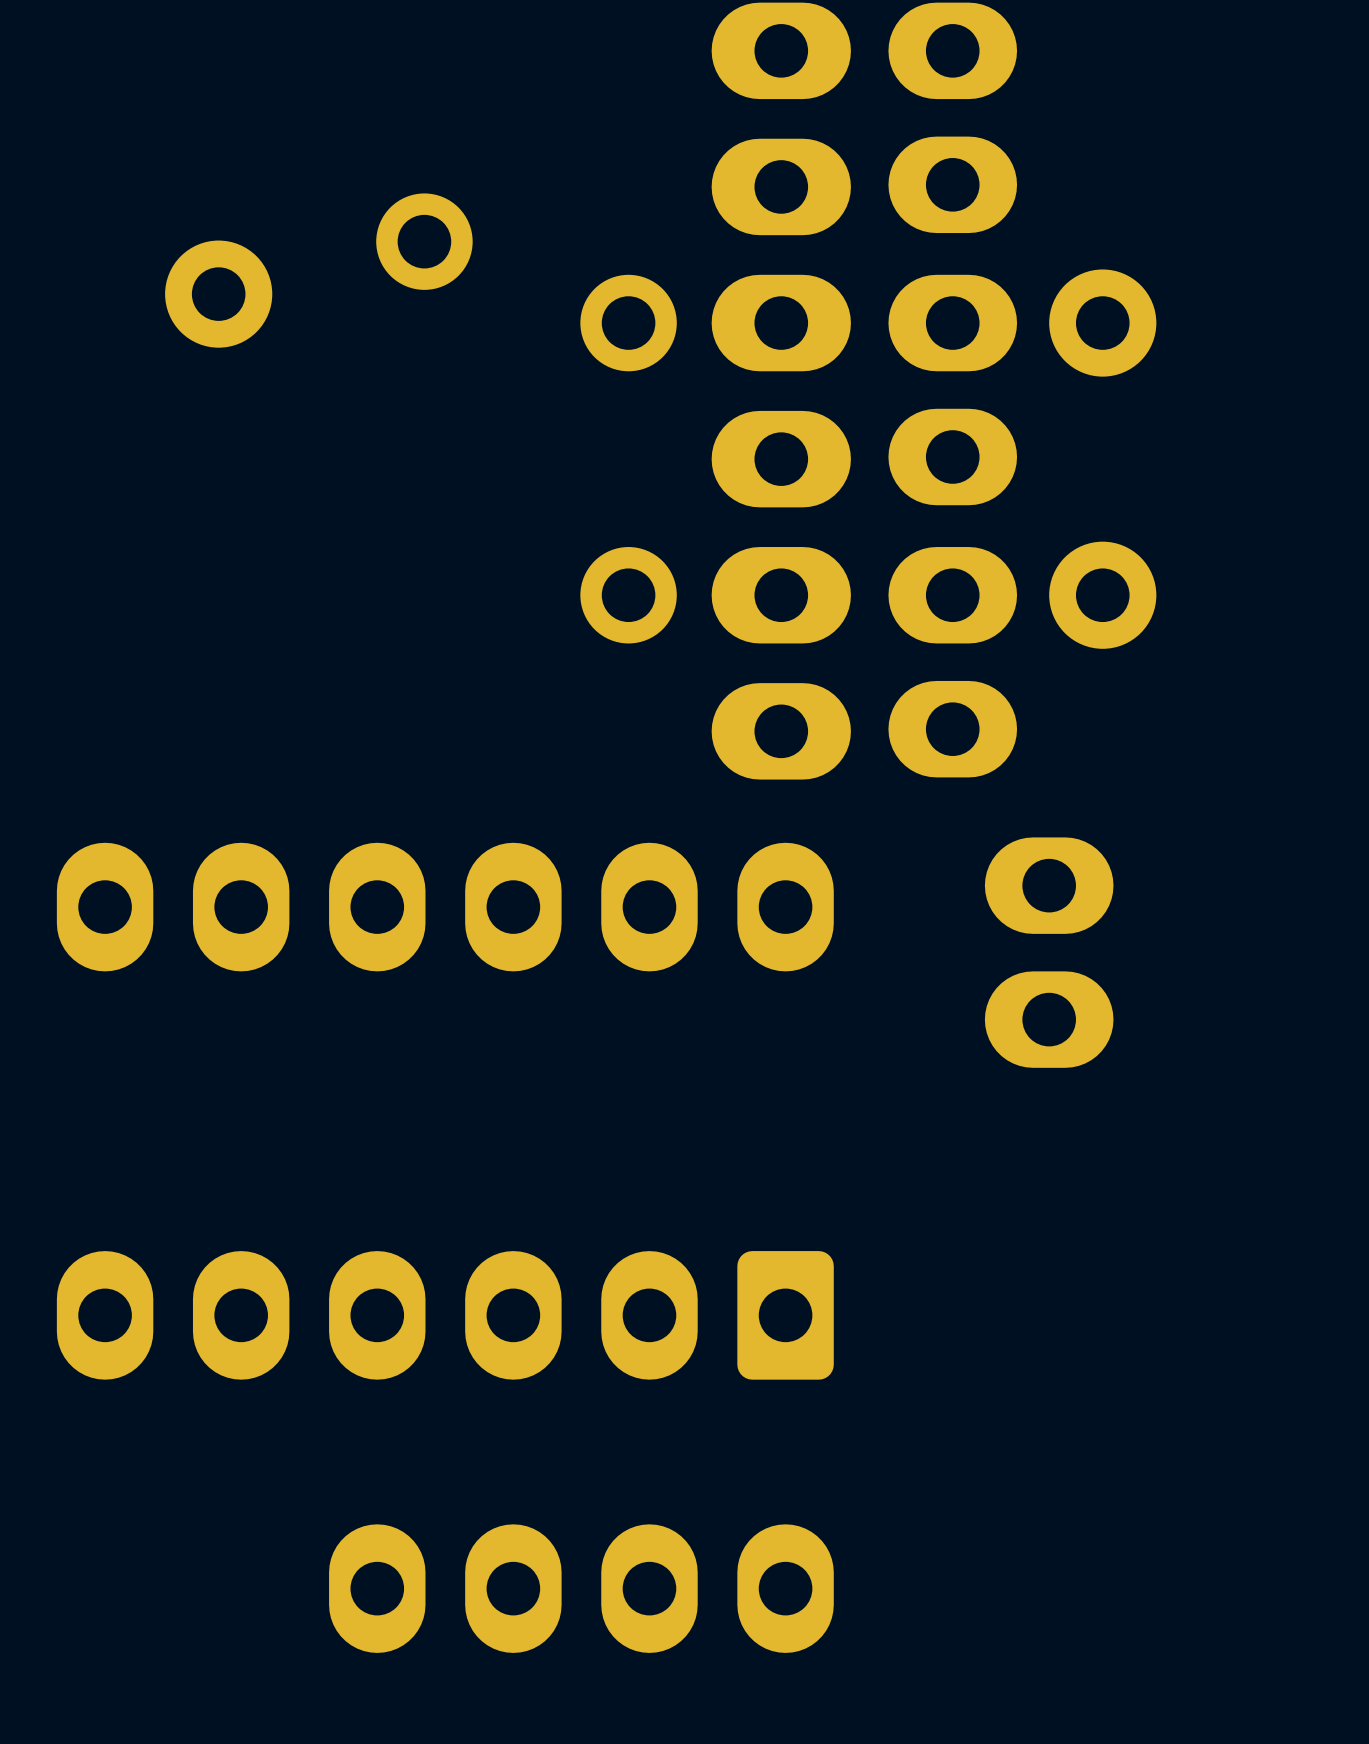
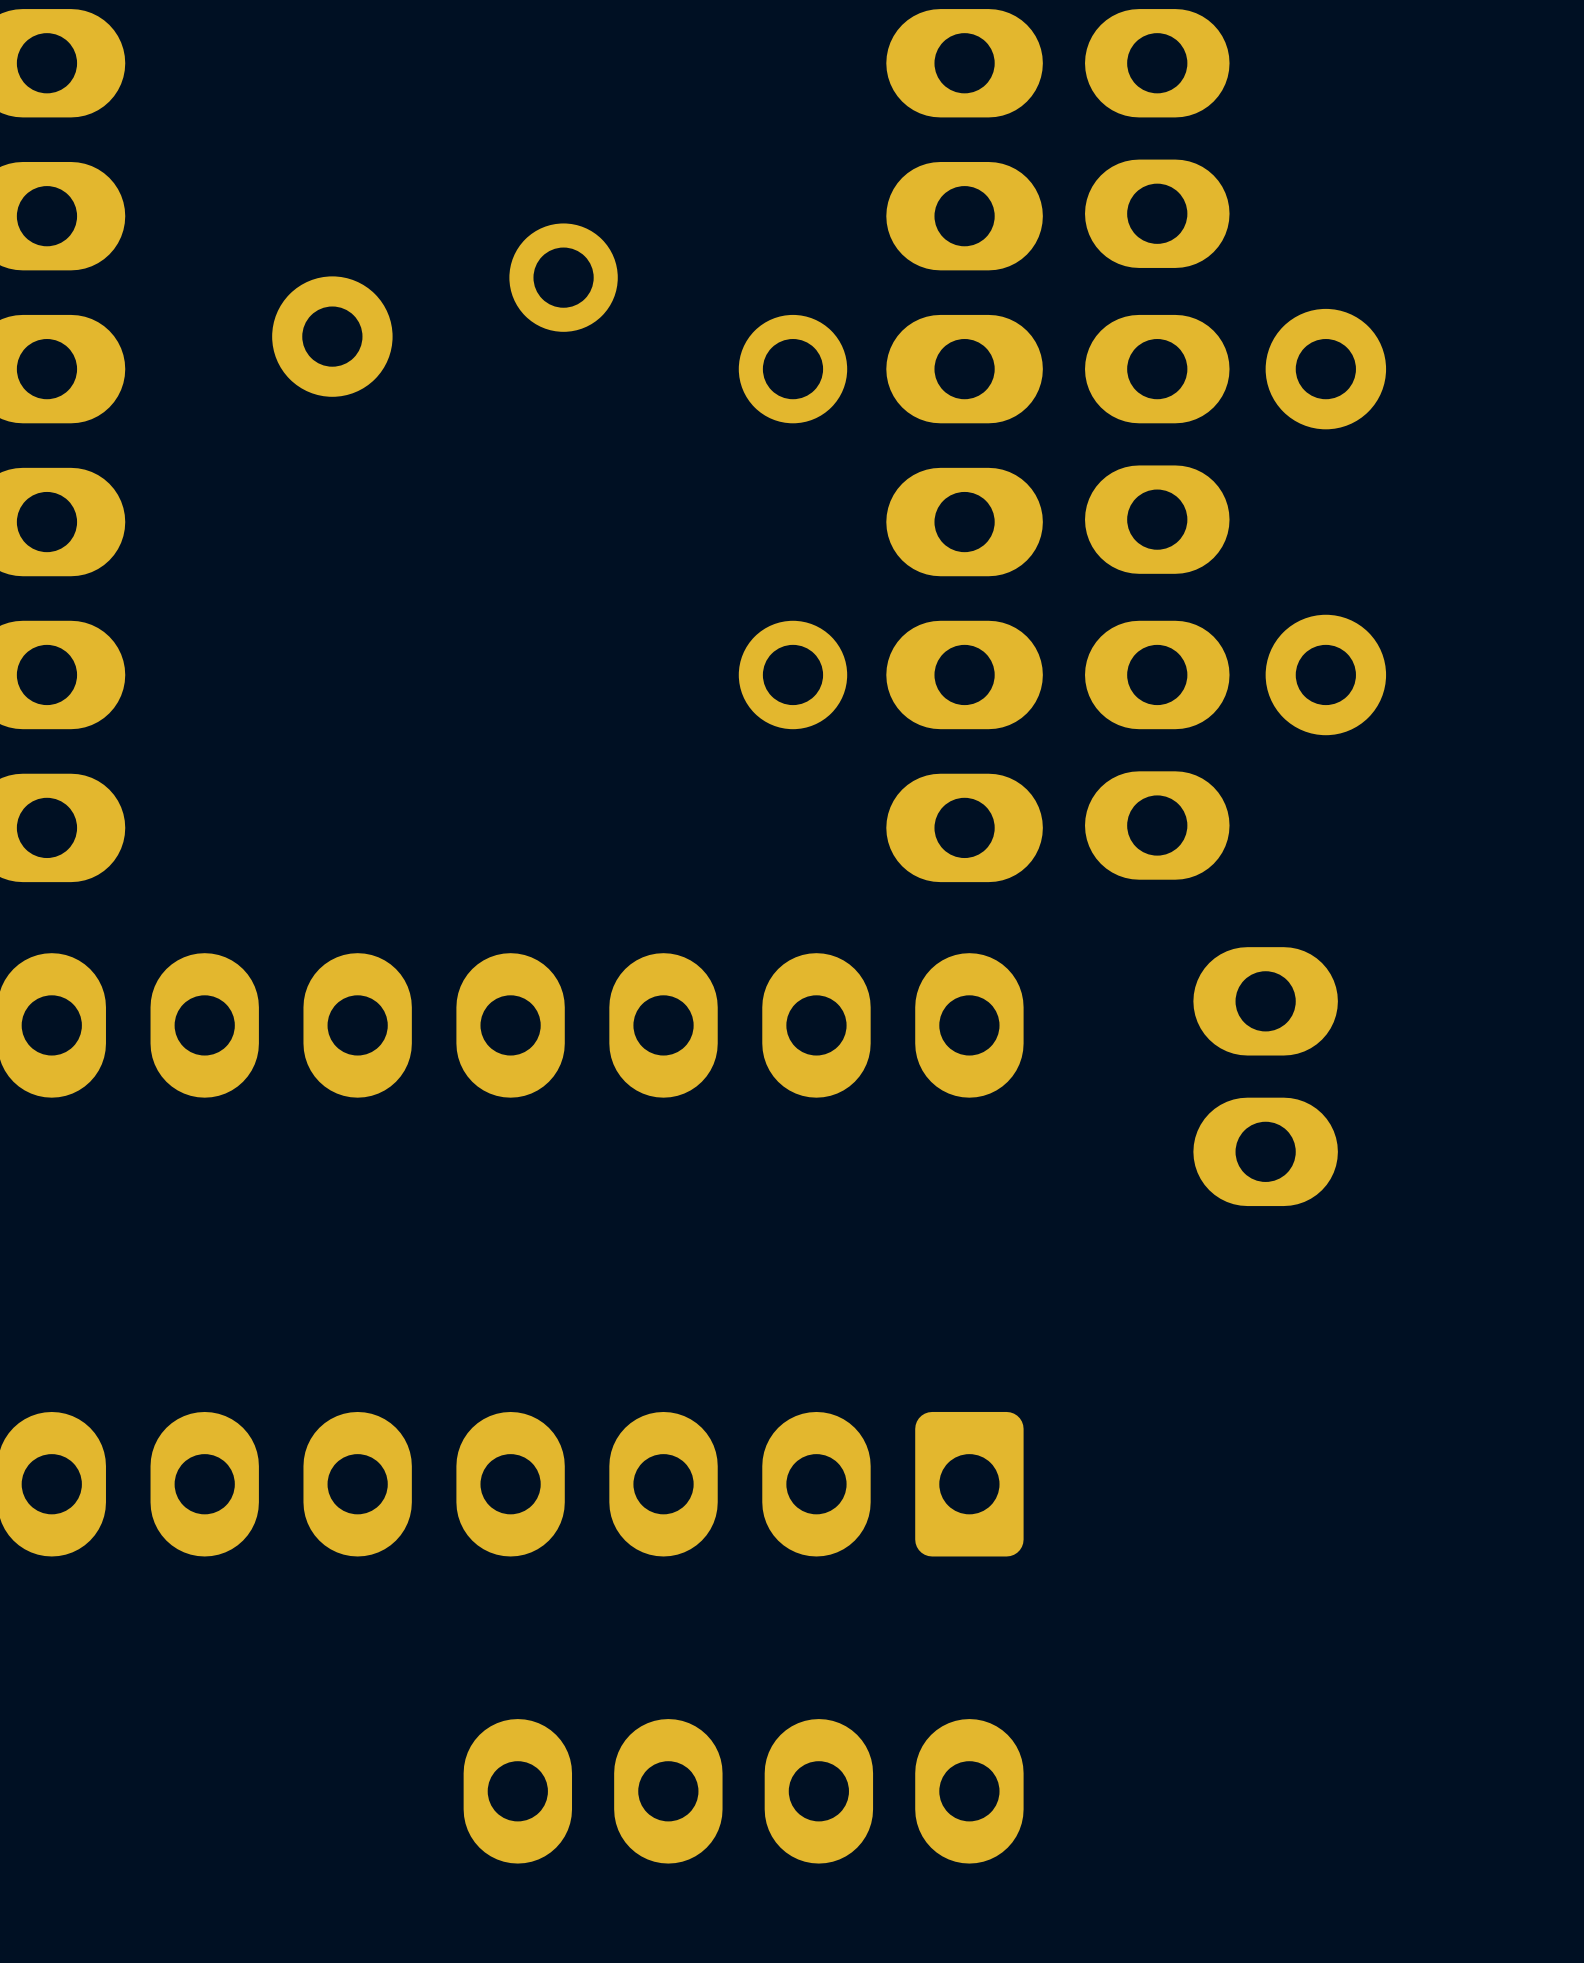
part footprint: [329, 1524, 834, 1653] -> [463, 1719, 1024, 1864]

